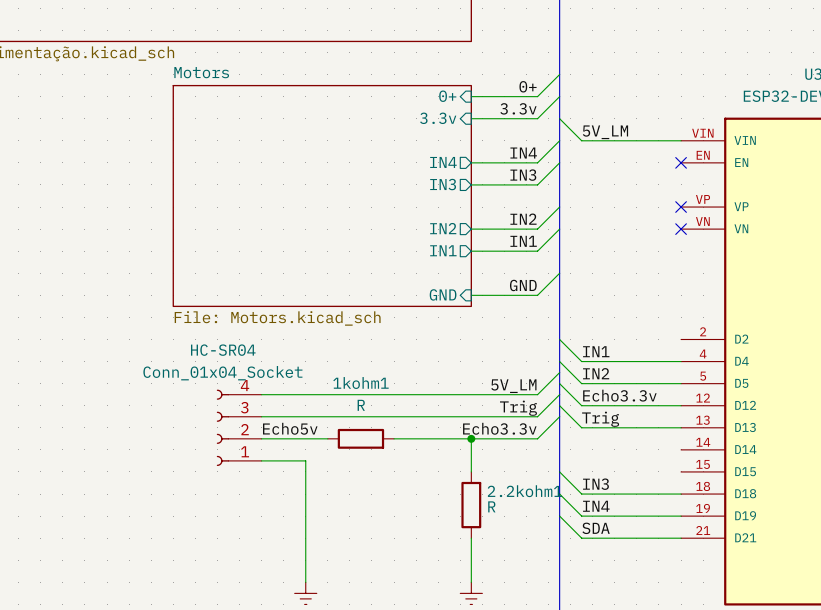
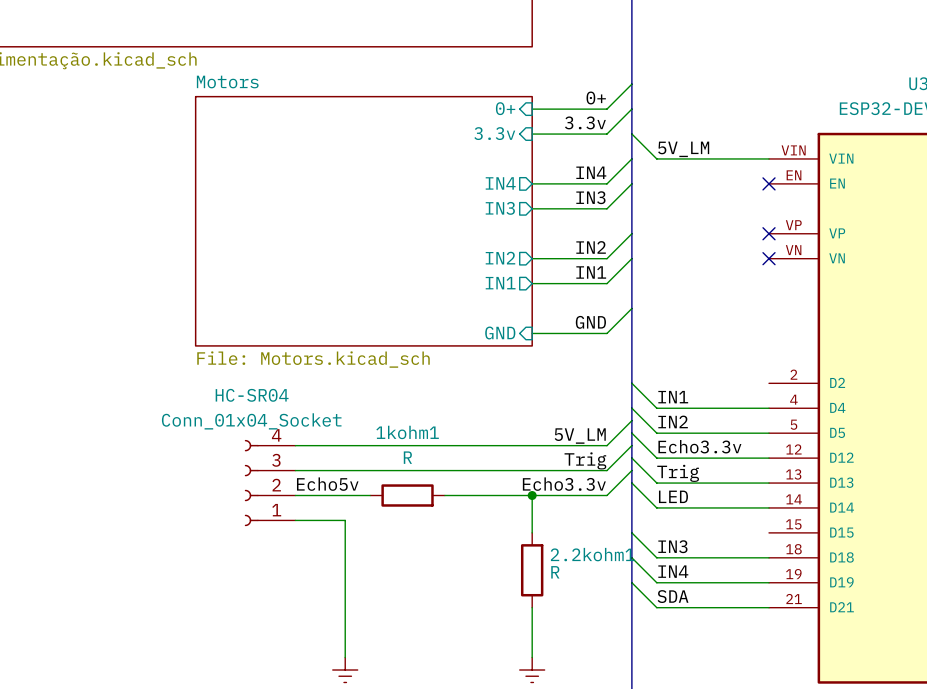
wire: none -> (631, 483) (656, 507) (769, 507)
label: none -> LED (673, 496)

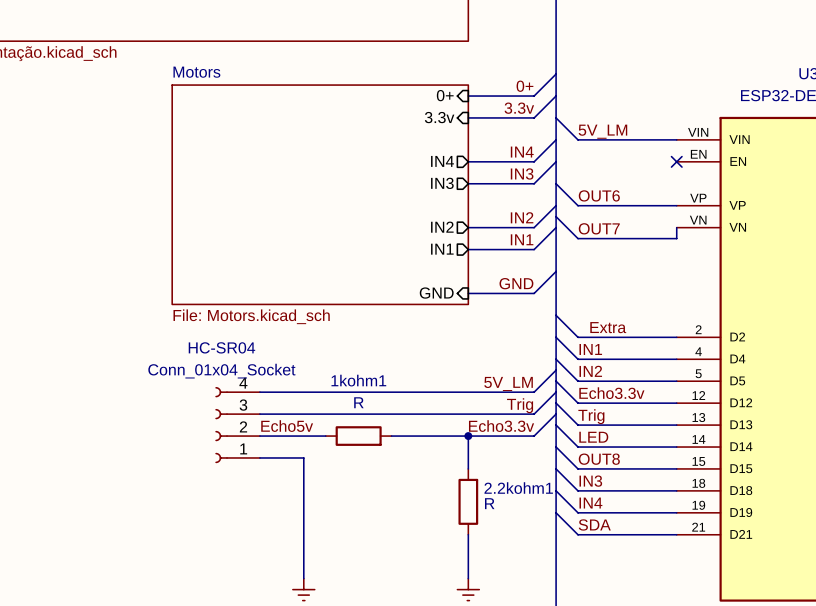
wire: none -> (556, 183) (578, 205) (676, 205)
label: none -> OUT6 (599, 195)
no-connect mark: (769, 233) -> none
wire: none -> (556, 216) (578, 238) (676, 238) (676, 227)
no-connect mark: (769, 258) -> none
label: none -> OUT7 (599, 228)
wire: none -> (556, 315) (578, 337) (676, 337)
label: none -> Extra (608, 327)
wire: none -> (556, 447) (578, 468) (676, 468)
label: none -> OUT8 (599, 459)

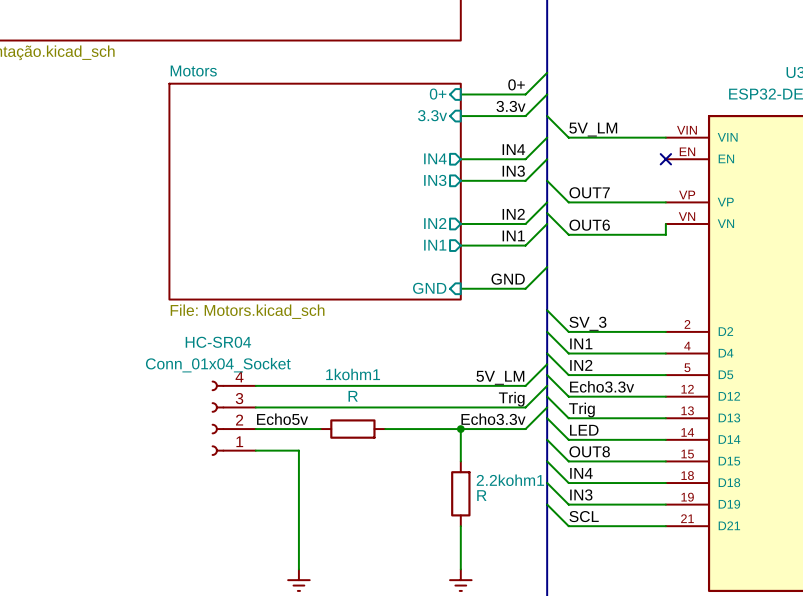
label: OUT6 (599, 195) -> OUT7 (589, 192)
label: OUT7 (599, 228) -> OUT6 (589, 225)
label: Extra (608, 327) -> none
label: none -> SV_3 (587, 323)
label: IN3 (590, 481) -> IN4 (581, 473)
label: IN4 (590, 503) -> IN3 (581, 494)
label: SDA (594, 524) -> SCL (584, 516)

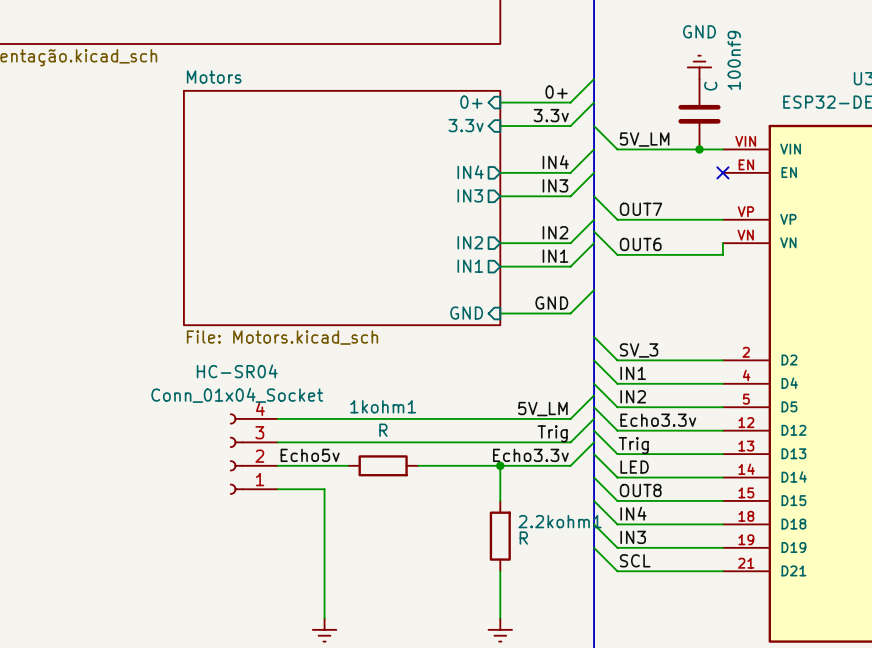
power symbol: none -> GND (699, 67)
100nf9: none -> C (699, 114)
junction: none -> (699, 149)

